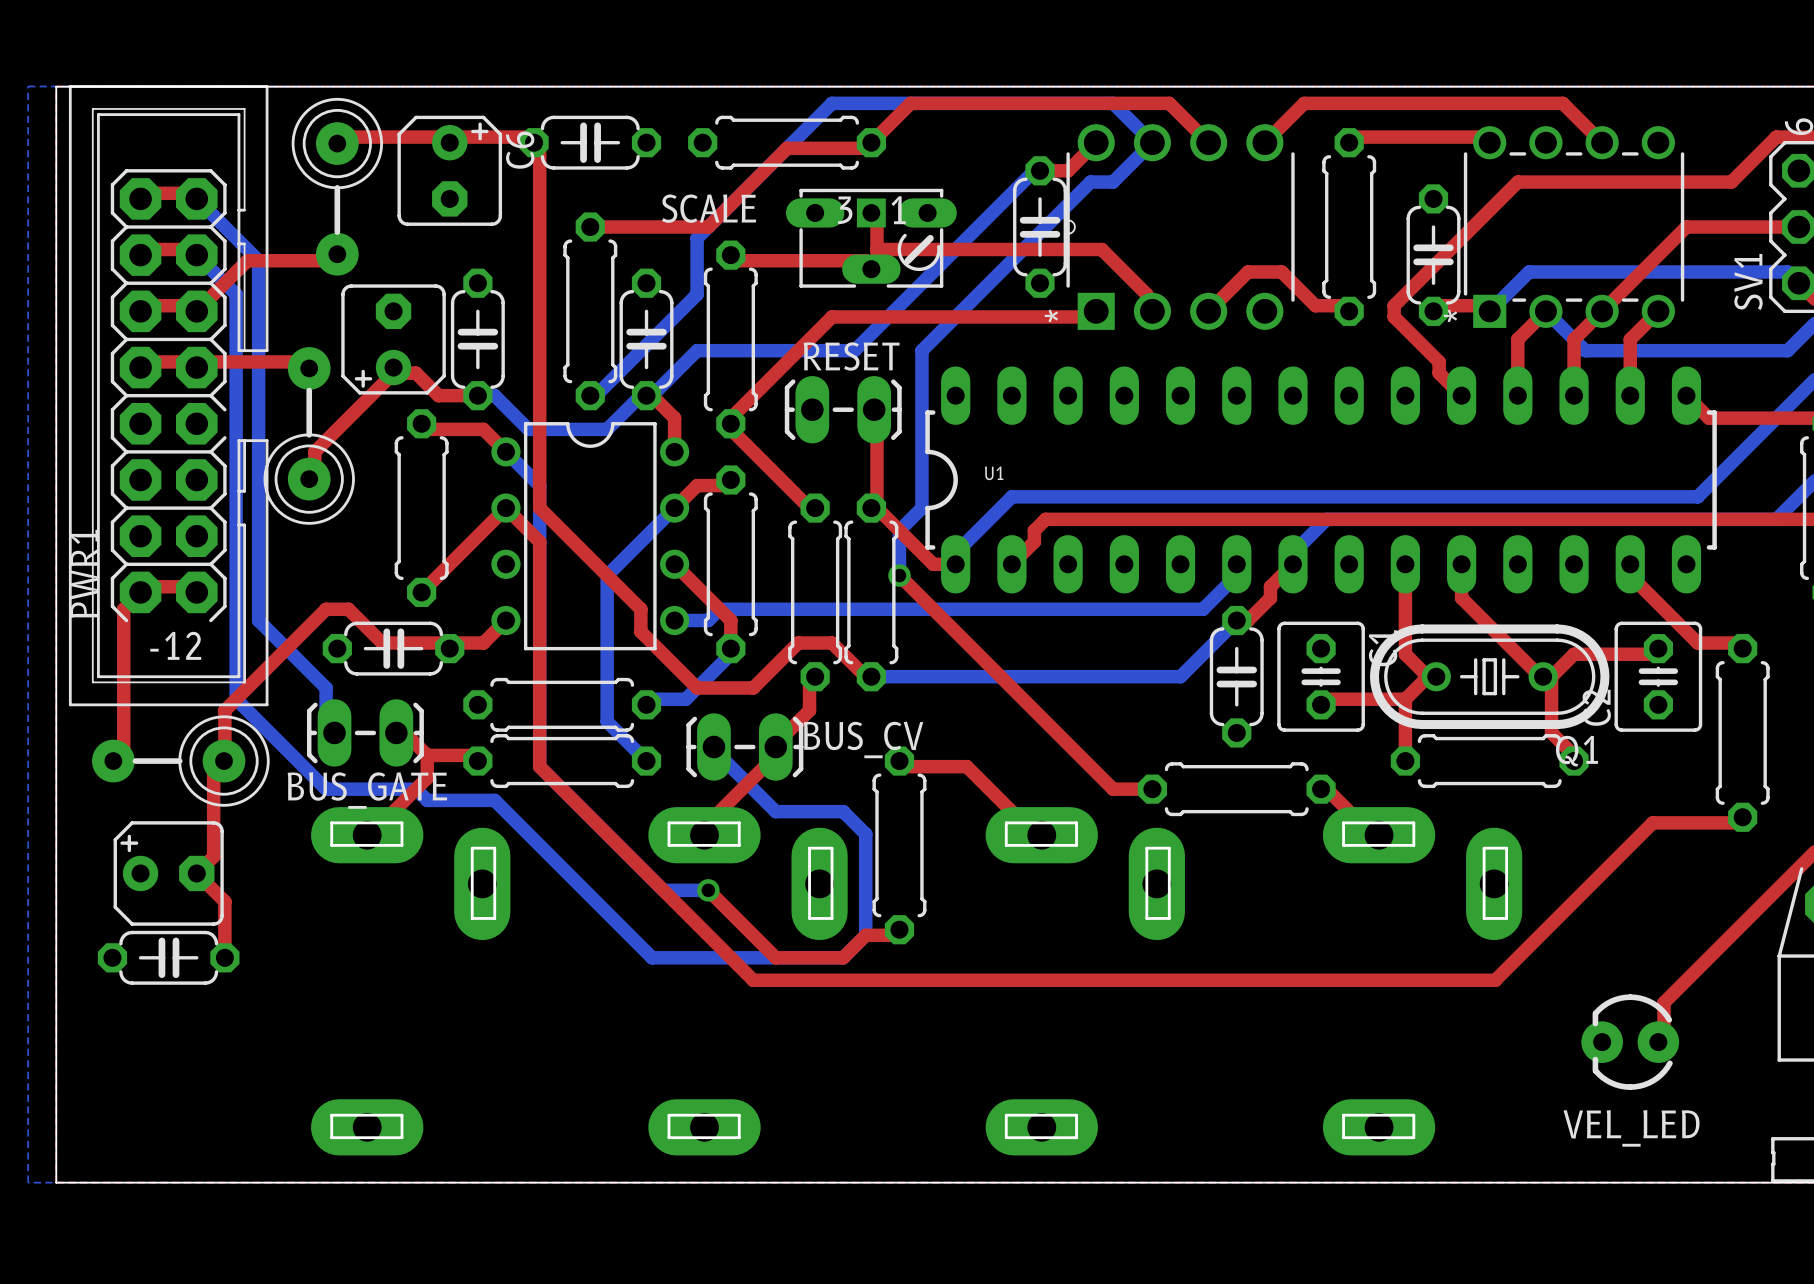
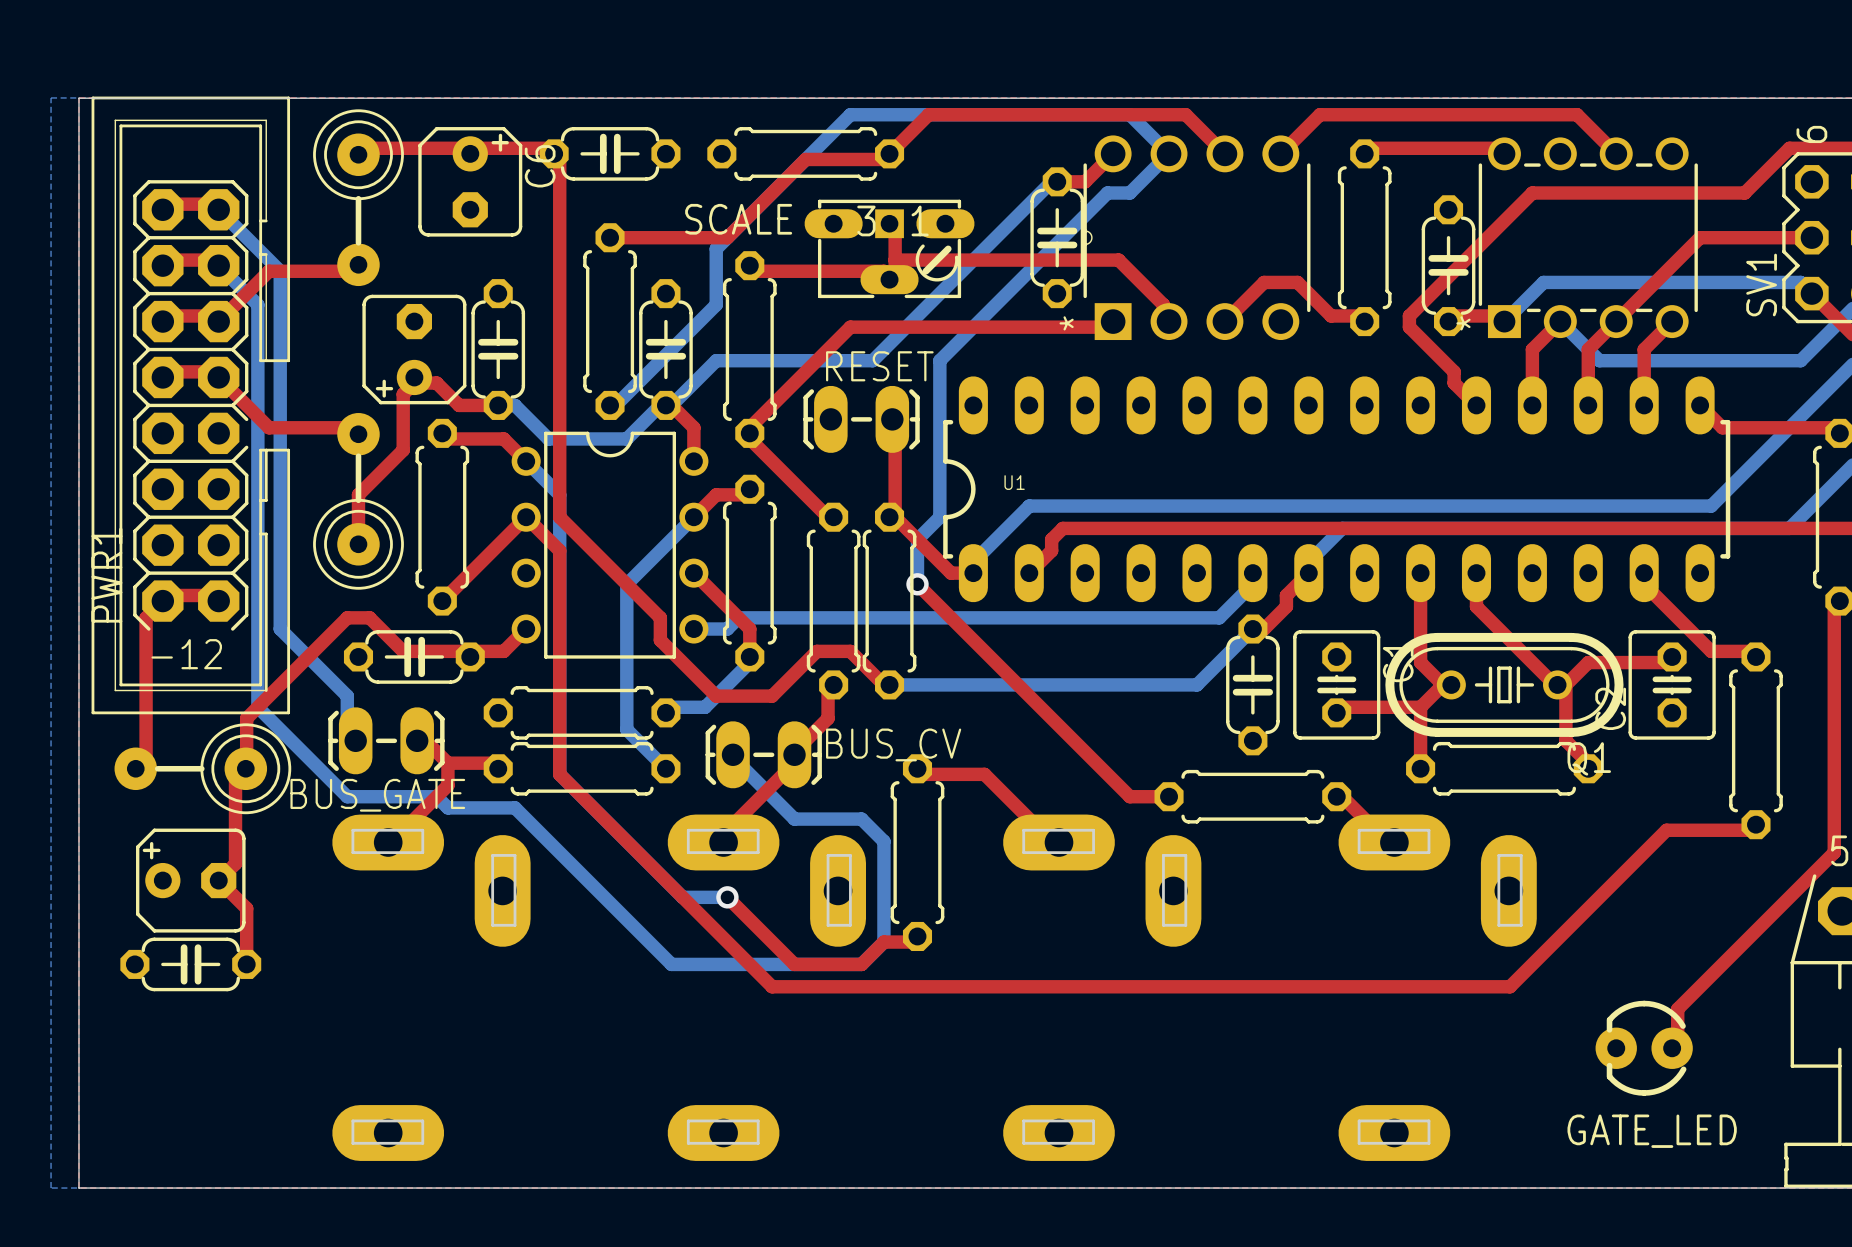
top track: (196, 367) (202, 361) (303, 361) (309, 368) -> (218, 377) (269, 427) (358, 427) (358, 434)
top track: (382, 384) (314, 451) (314, 474) (309, 479) -> (403, 394) (403, 450) (358, 494) (358, 544)
part position: (309, 435) -> (358, 501)
VEL_LED name: VEL_LED (1631, 1128) -> GATE_LED (1652, 1131)

